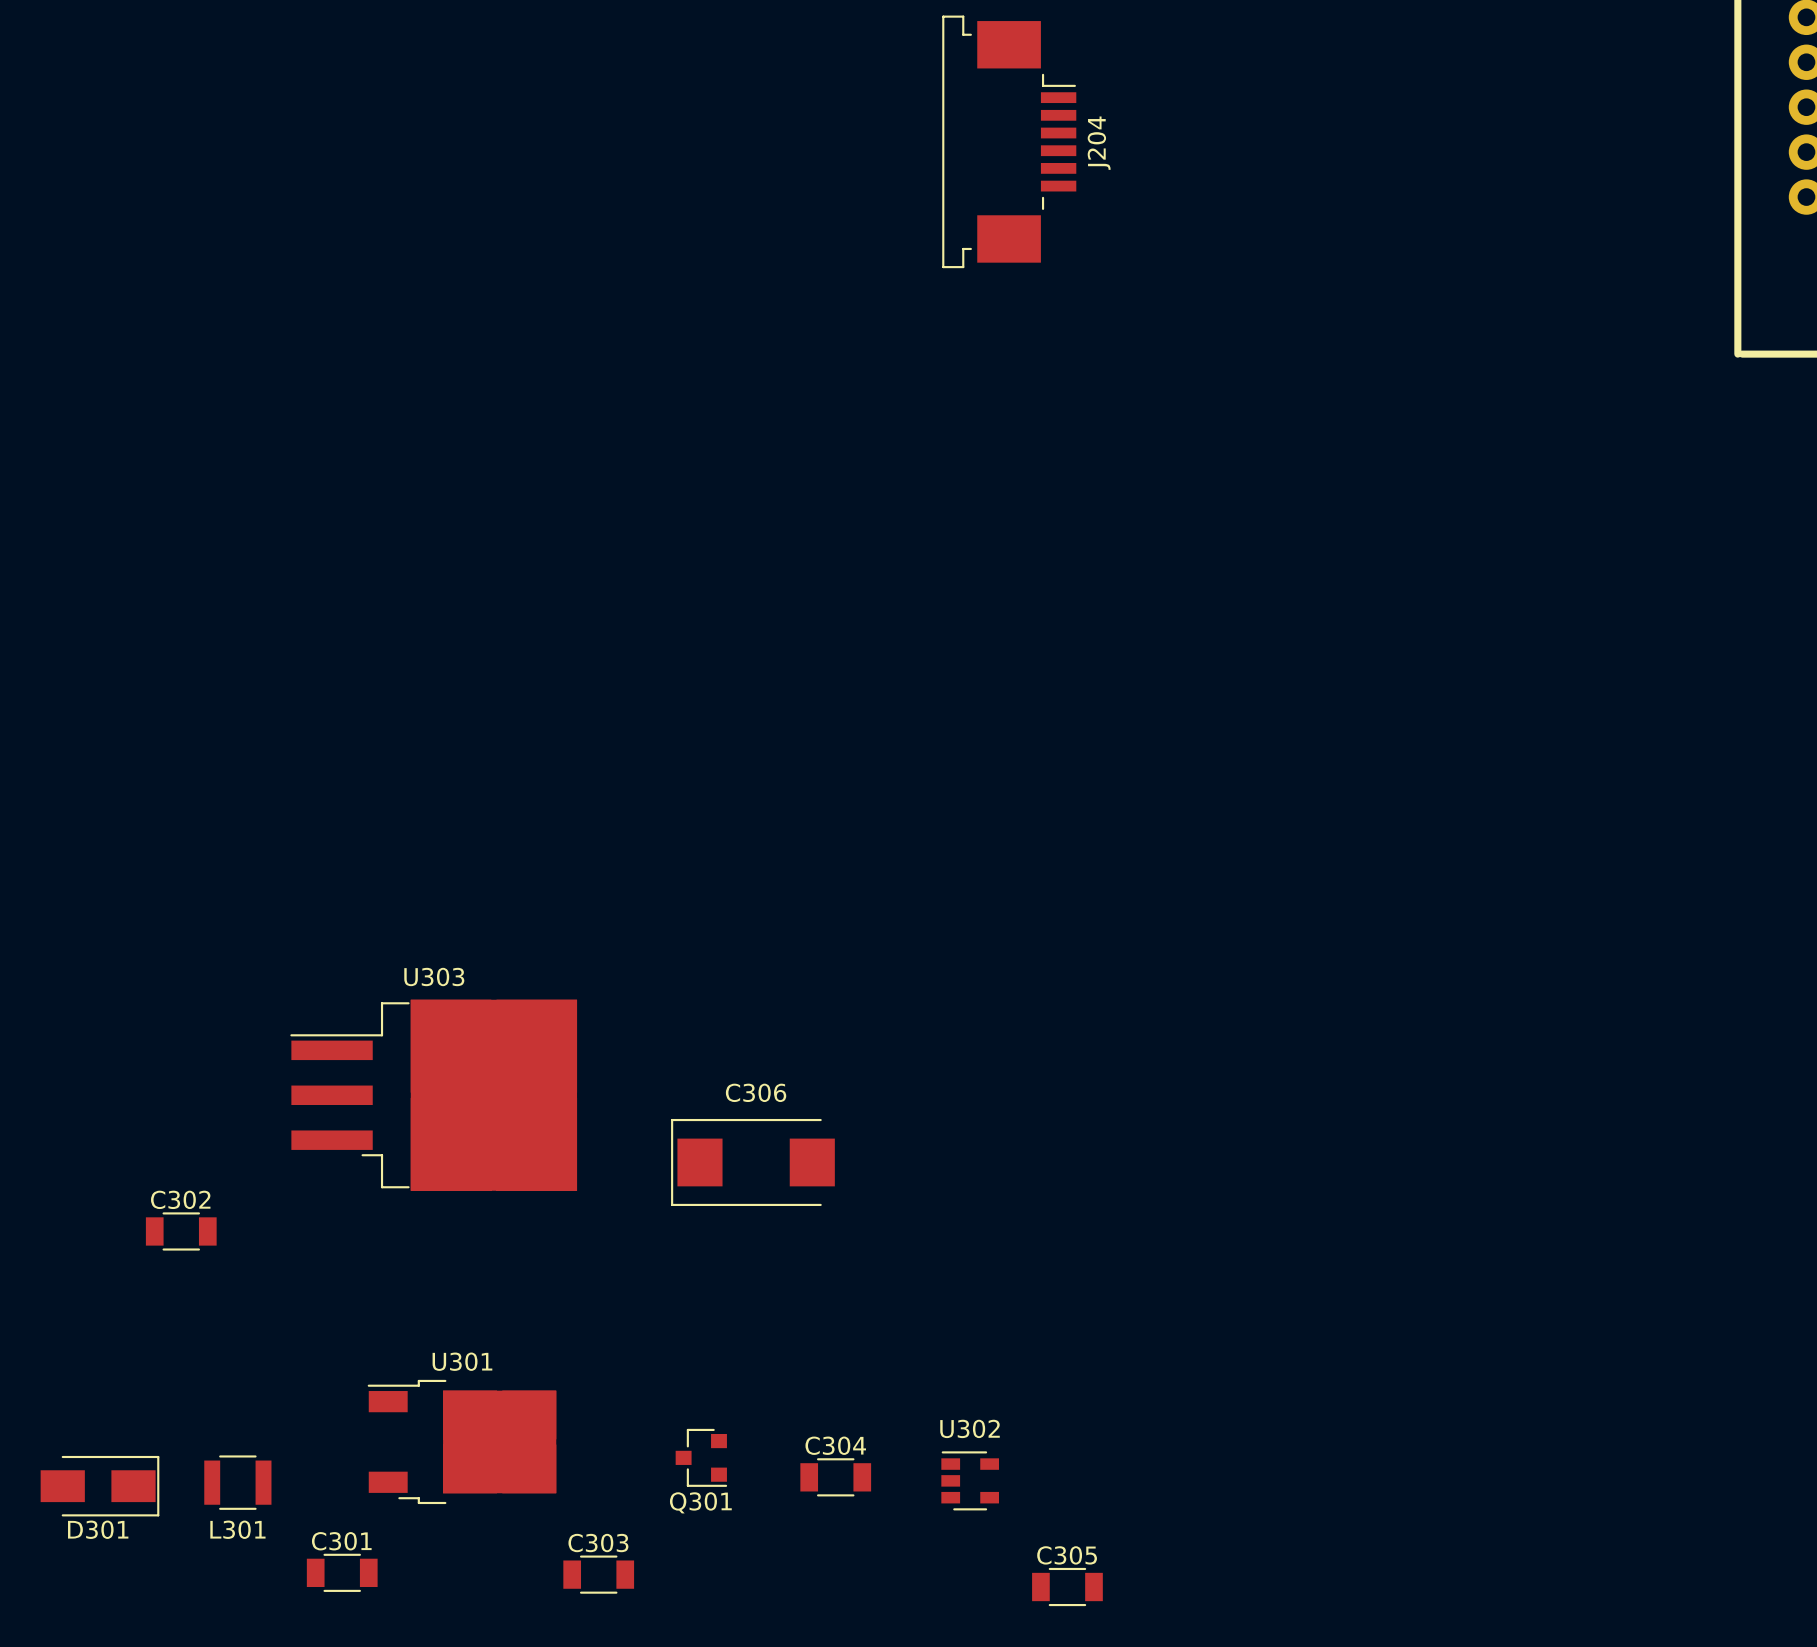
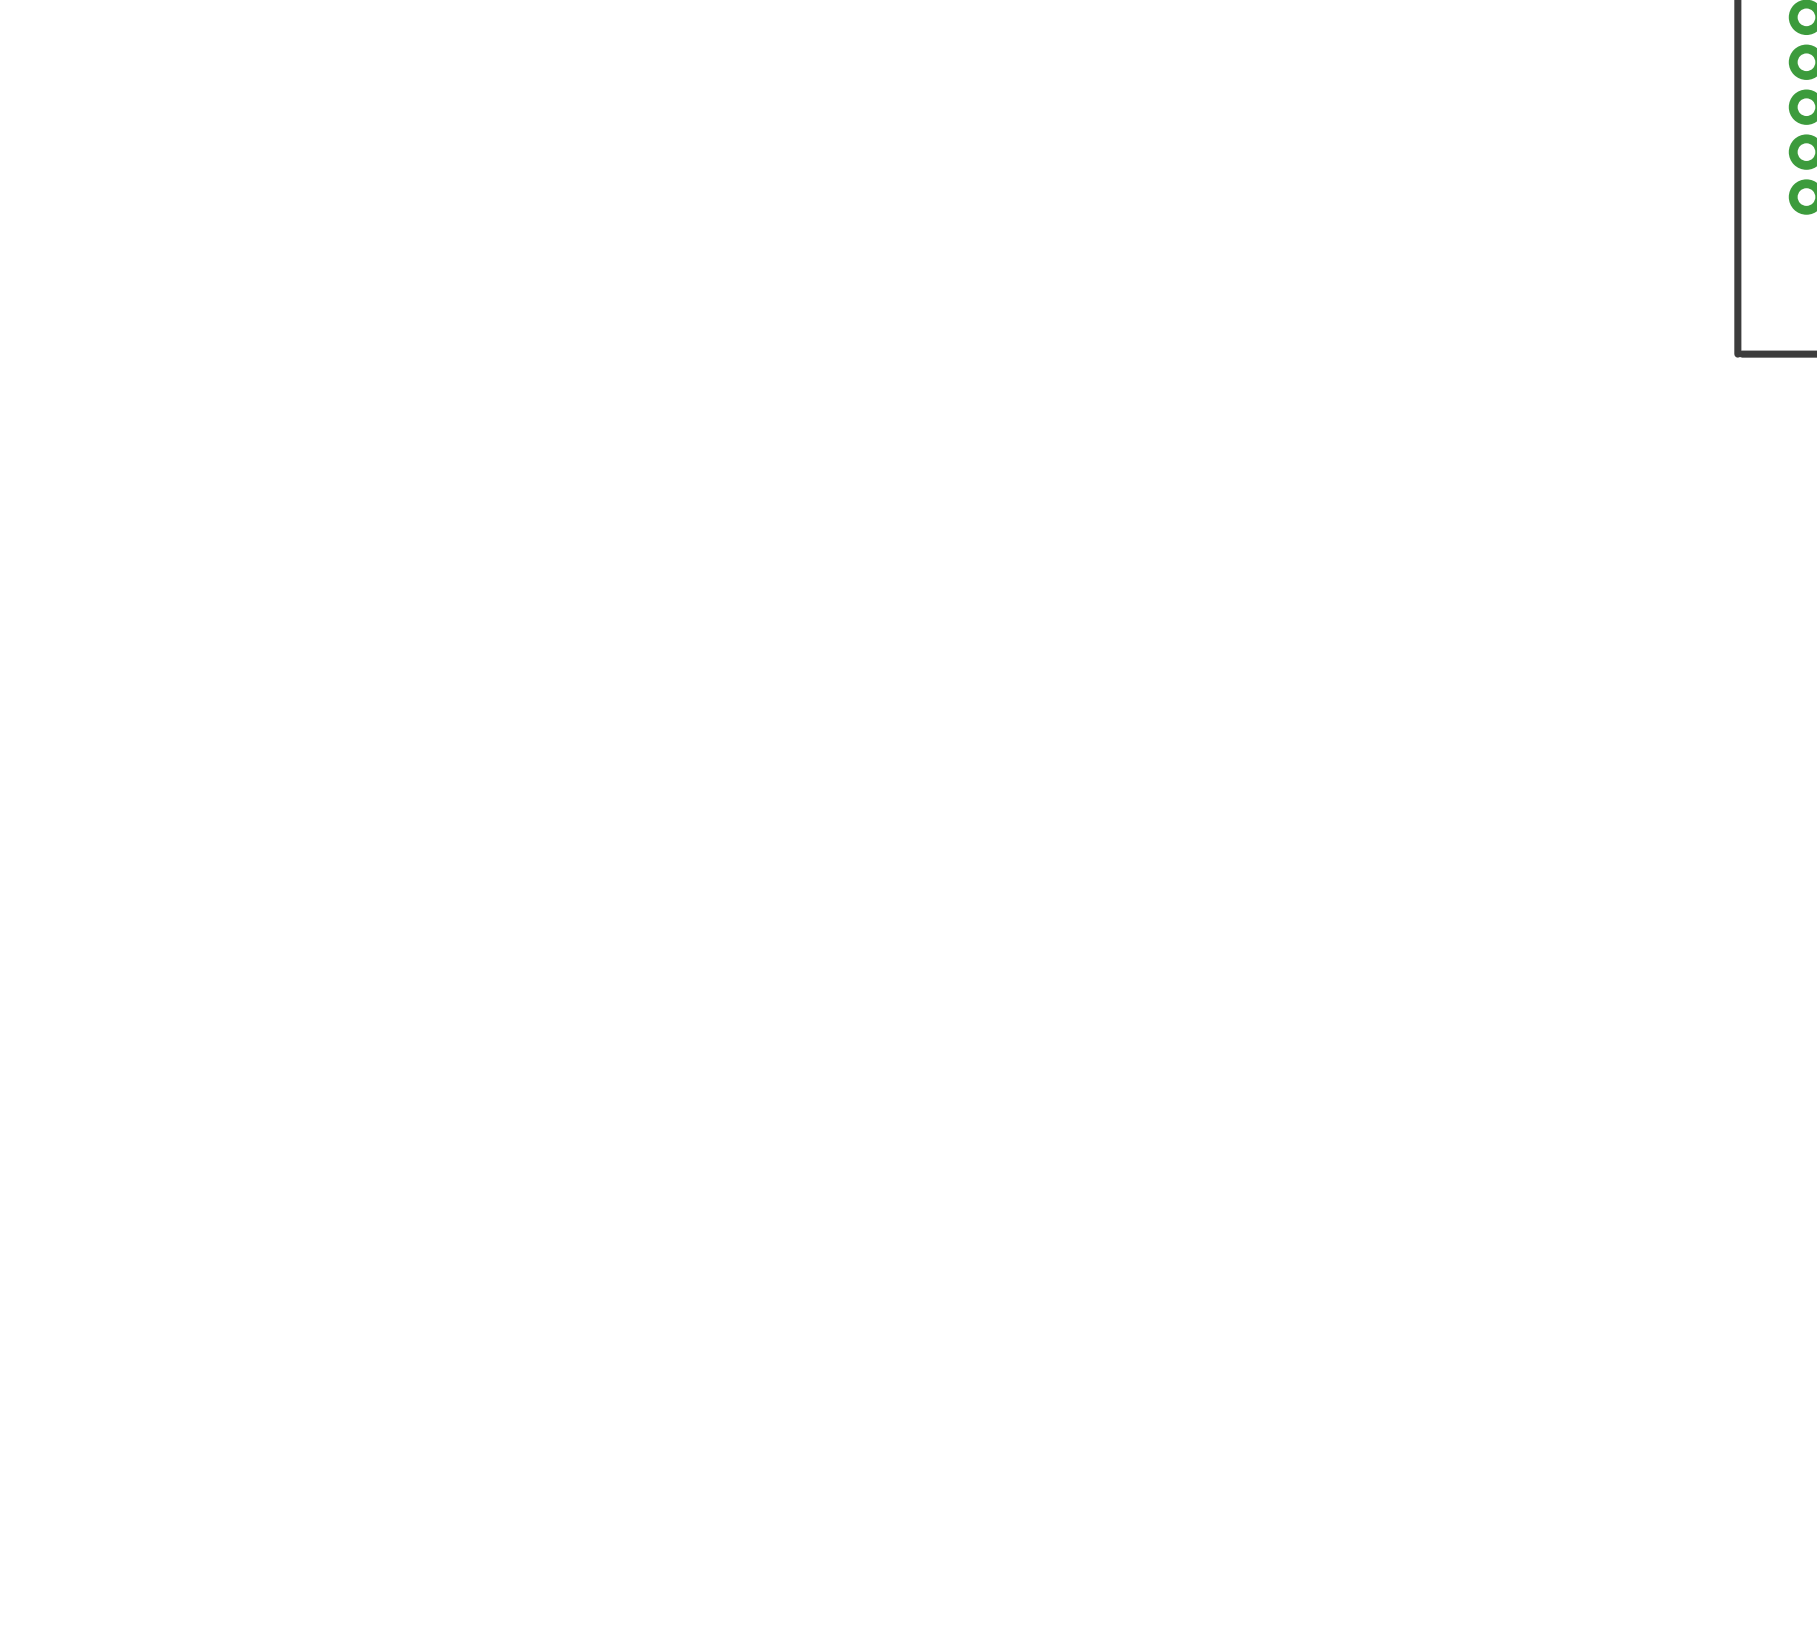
J204: (1009, 141) -> none
U303: (433, 1095) -> none
C306: (752, 1162) -> none
C302: (181, 1231) -> none
U301: (461, 1441) -> none
Q301: (701, 1457) -> none
C304: (835, 1477) -> none
U302: (970, 1480) -> none
L301: (237, 1482) -> none
D301: (99, 1486) -> none
C301: (342, 1572) -> none
C303: (598, 1574) -> none
C305: (1067, 1587) -> none

